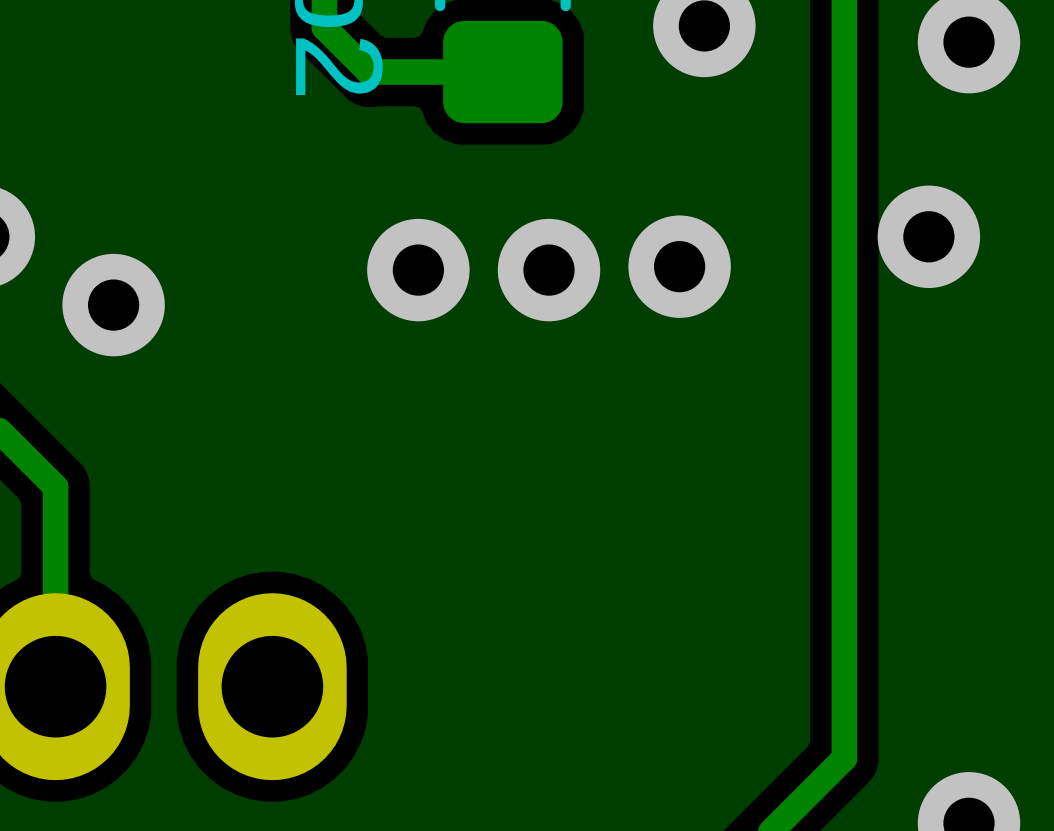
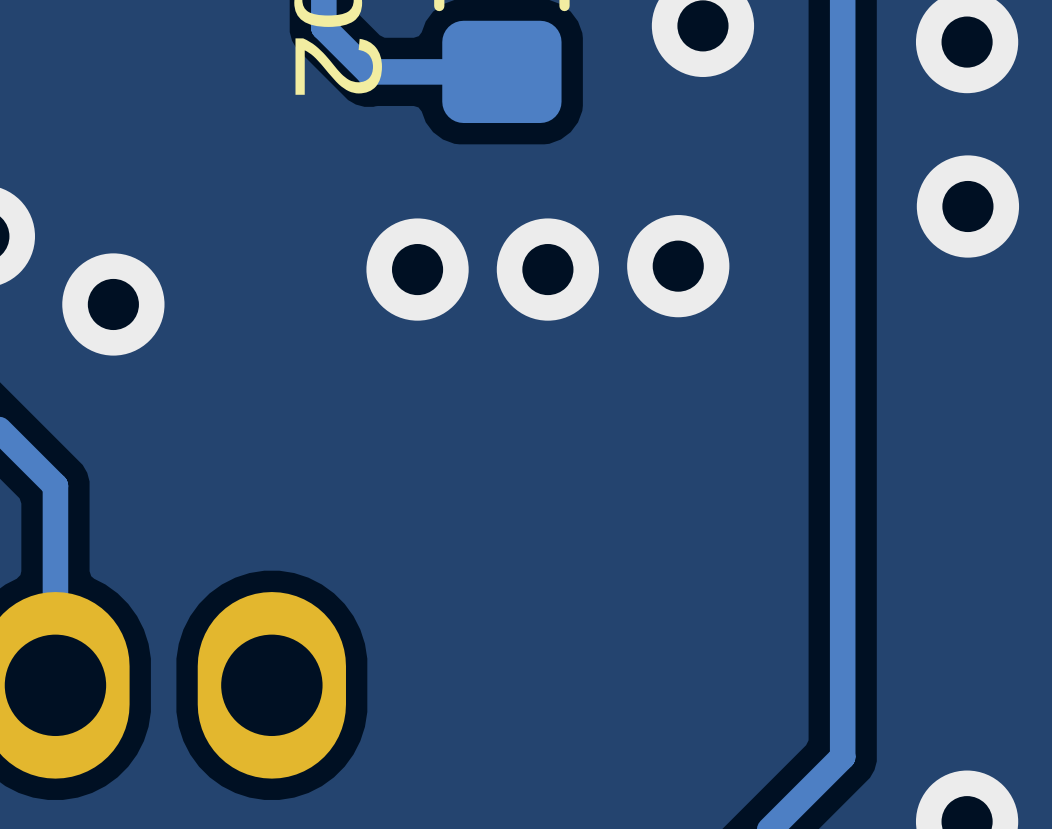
via position: (928, 236) -> (967, 206)

